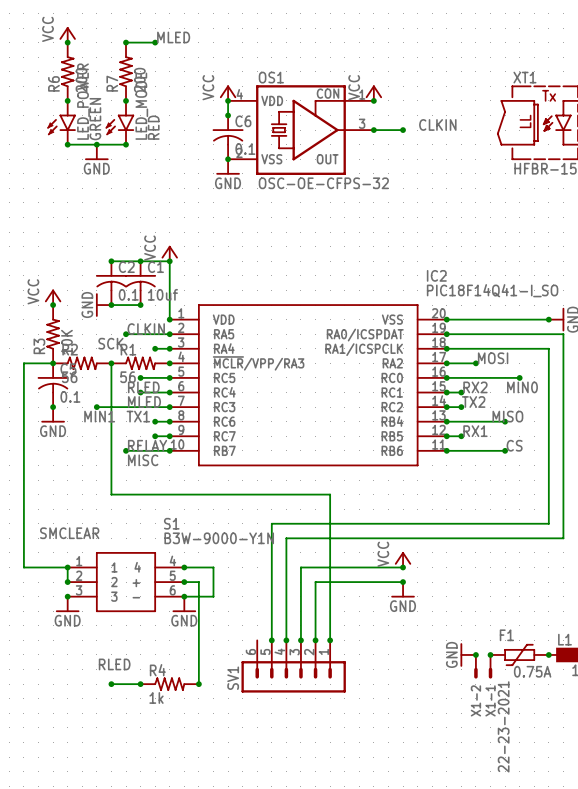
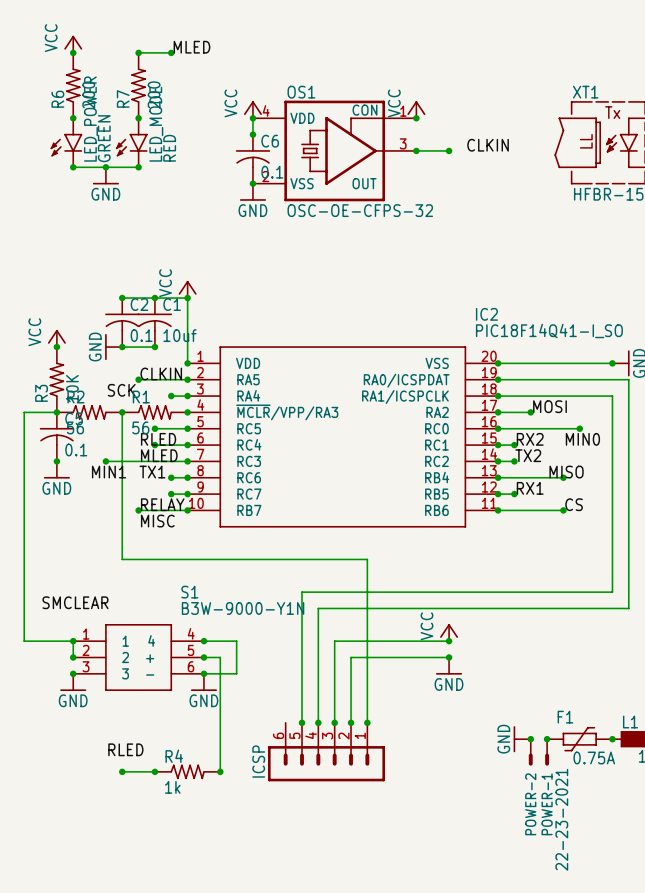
SV1 name: SV1 (233, 678) -> ICSP (258, 761)
X1-2 name: X1-2 (475, 700) -> POWER-2 (530, 804)
X1-1 name: X1-1 (490, 700) -> POWER-1 (547, 804)

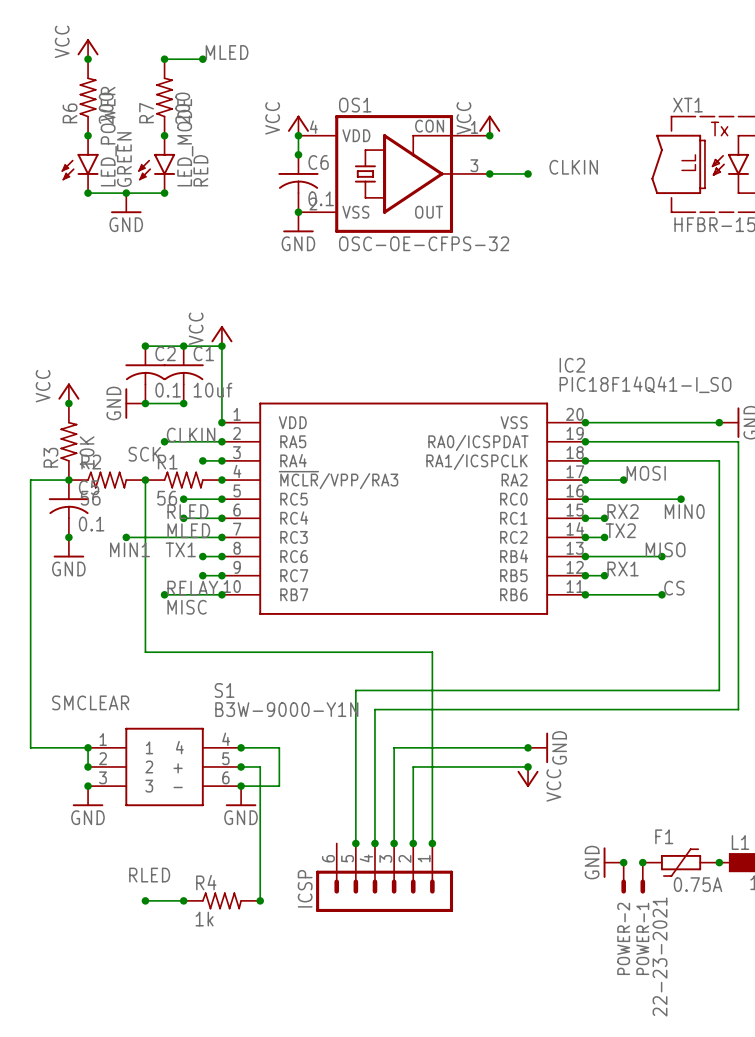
power symbol: VCC (449, 632) -> none
power symbol: none -> GND (538, 747)
power symbol: GND (449, 666) -> VCC (528, 777)

